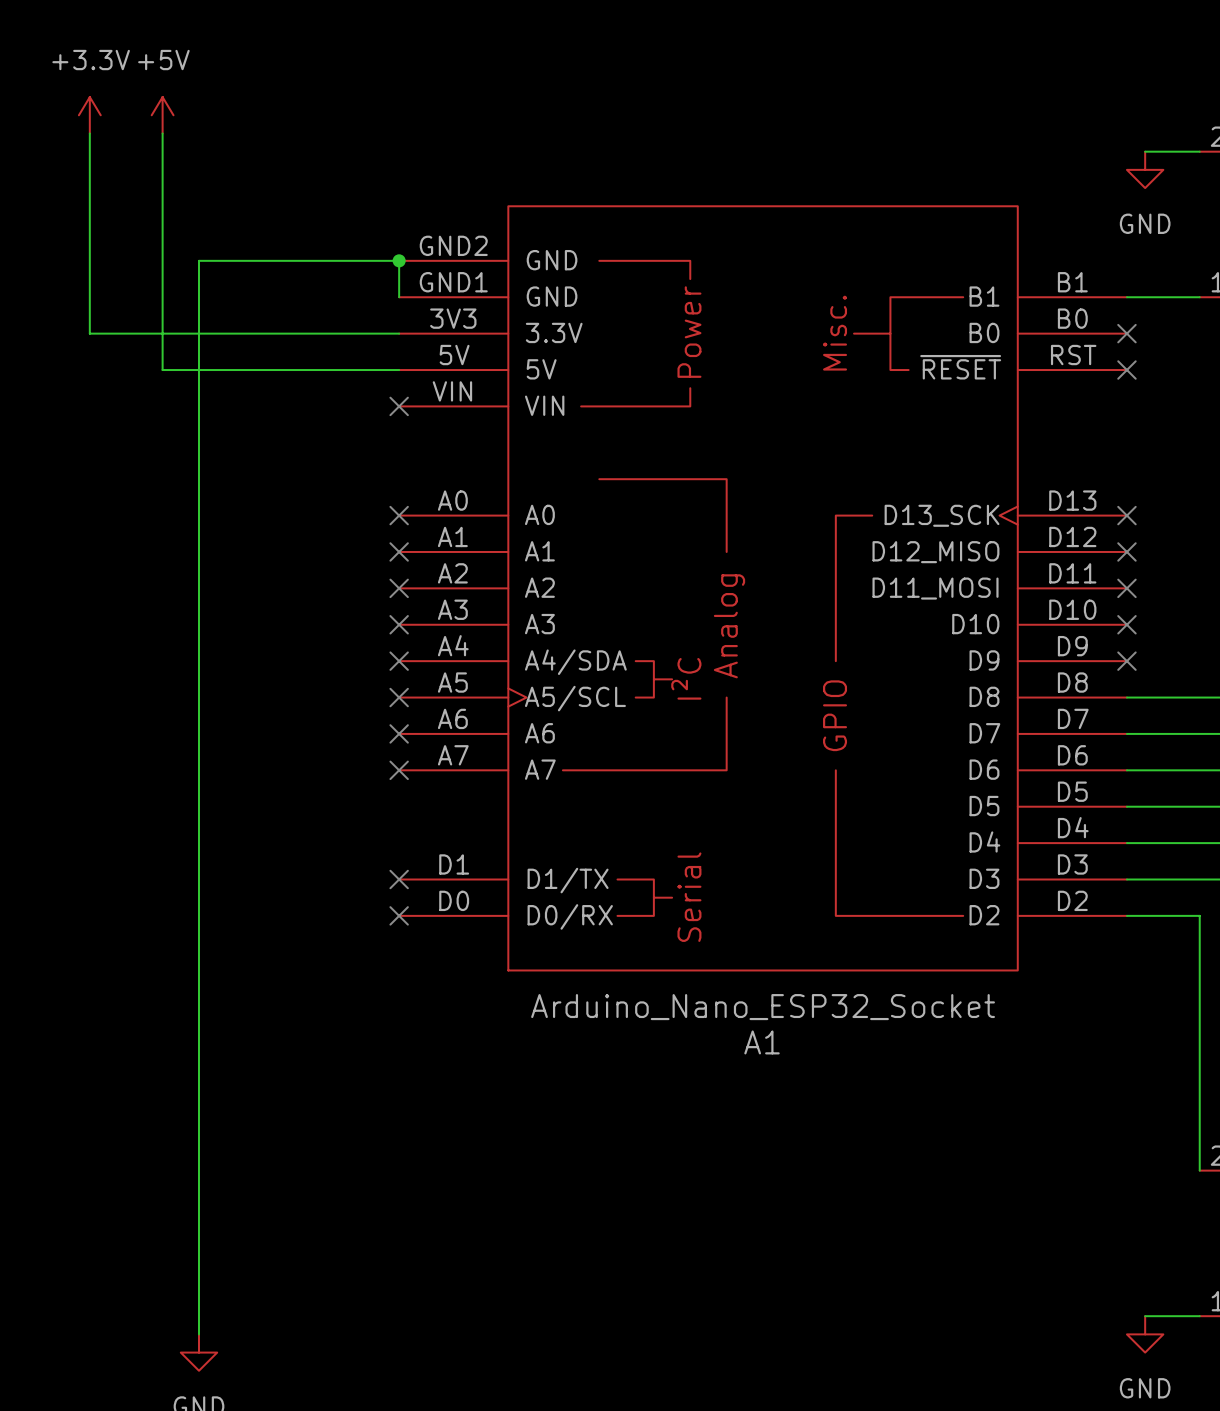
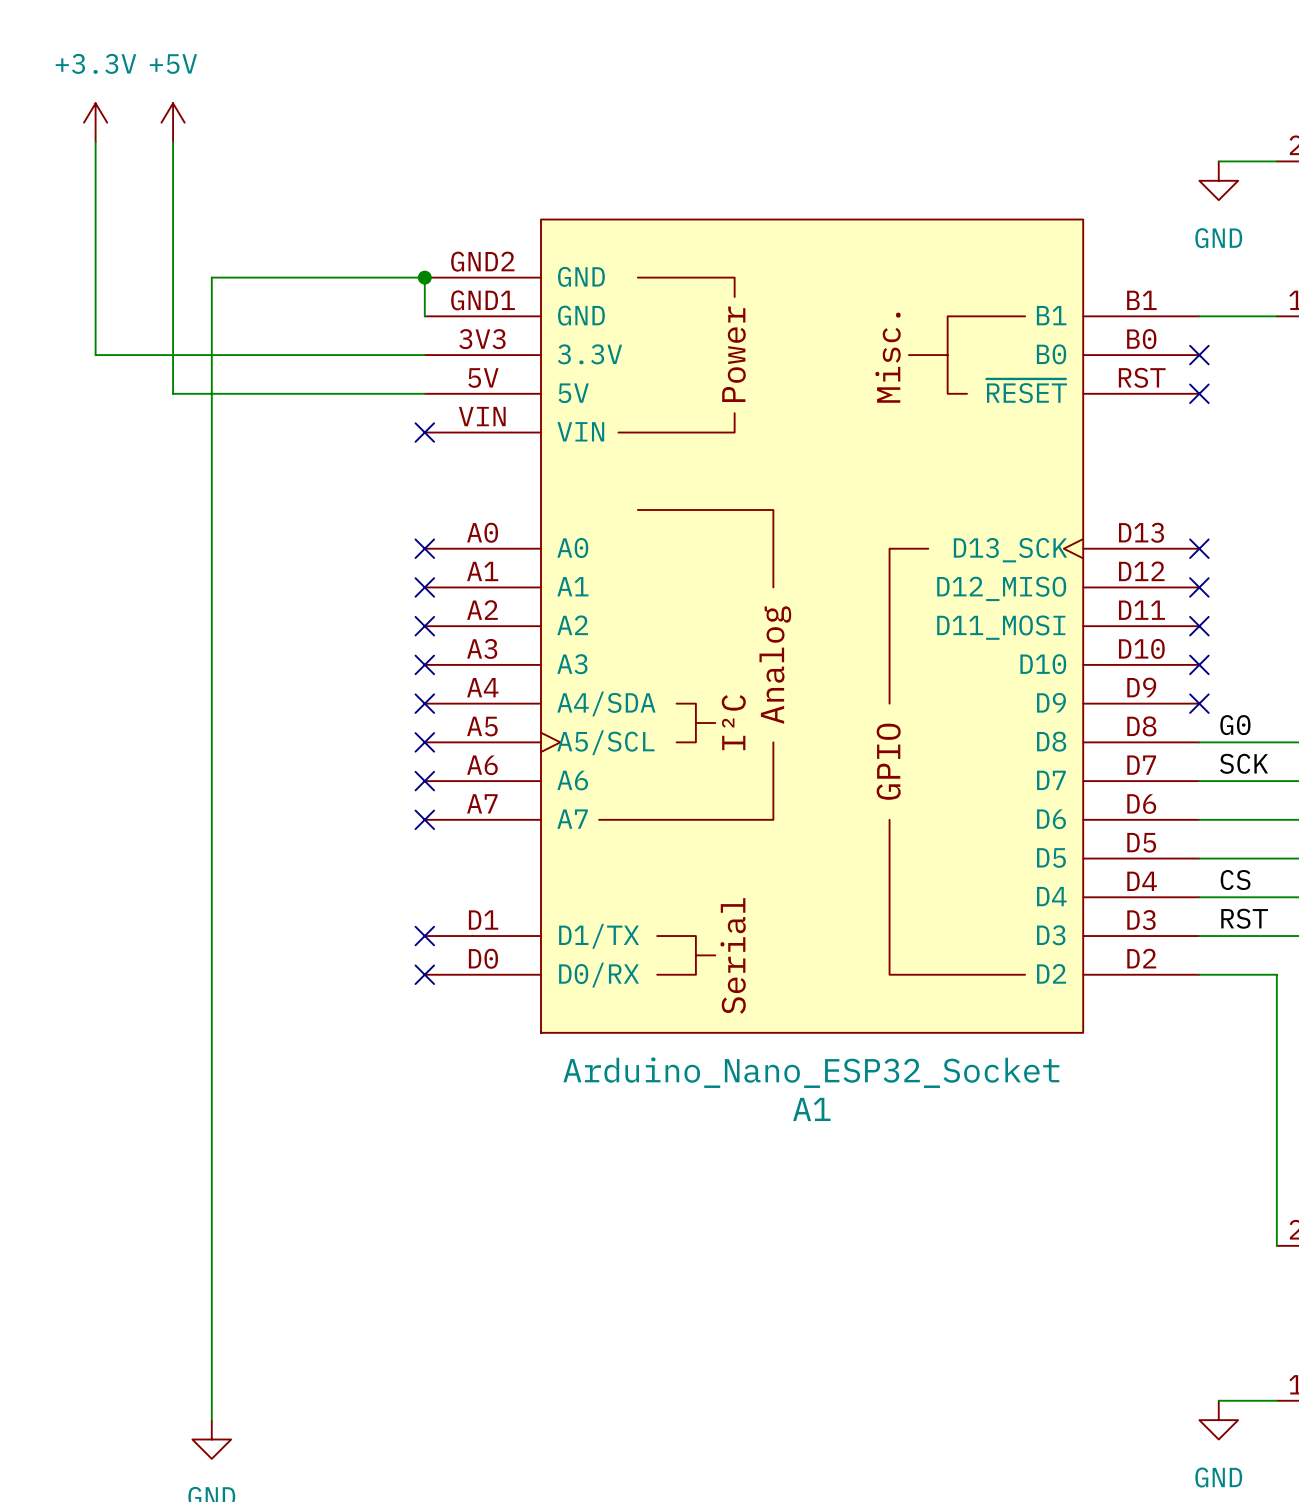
label: none -> G0 (1235, 725)
label: none -> SCK (1244, 763)
label: none -> CS (1235, 880)
label: none -> RST (1244, 918)

